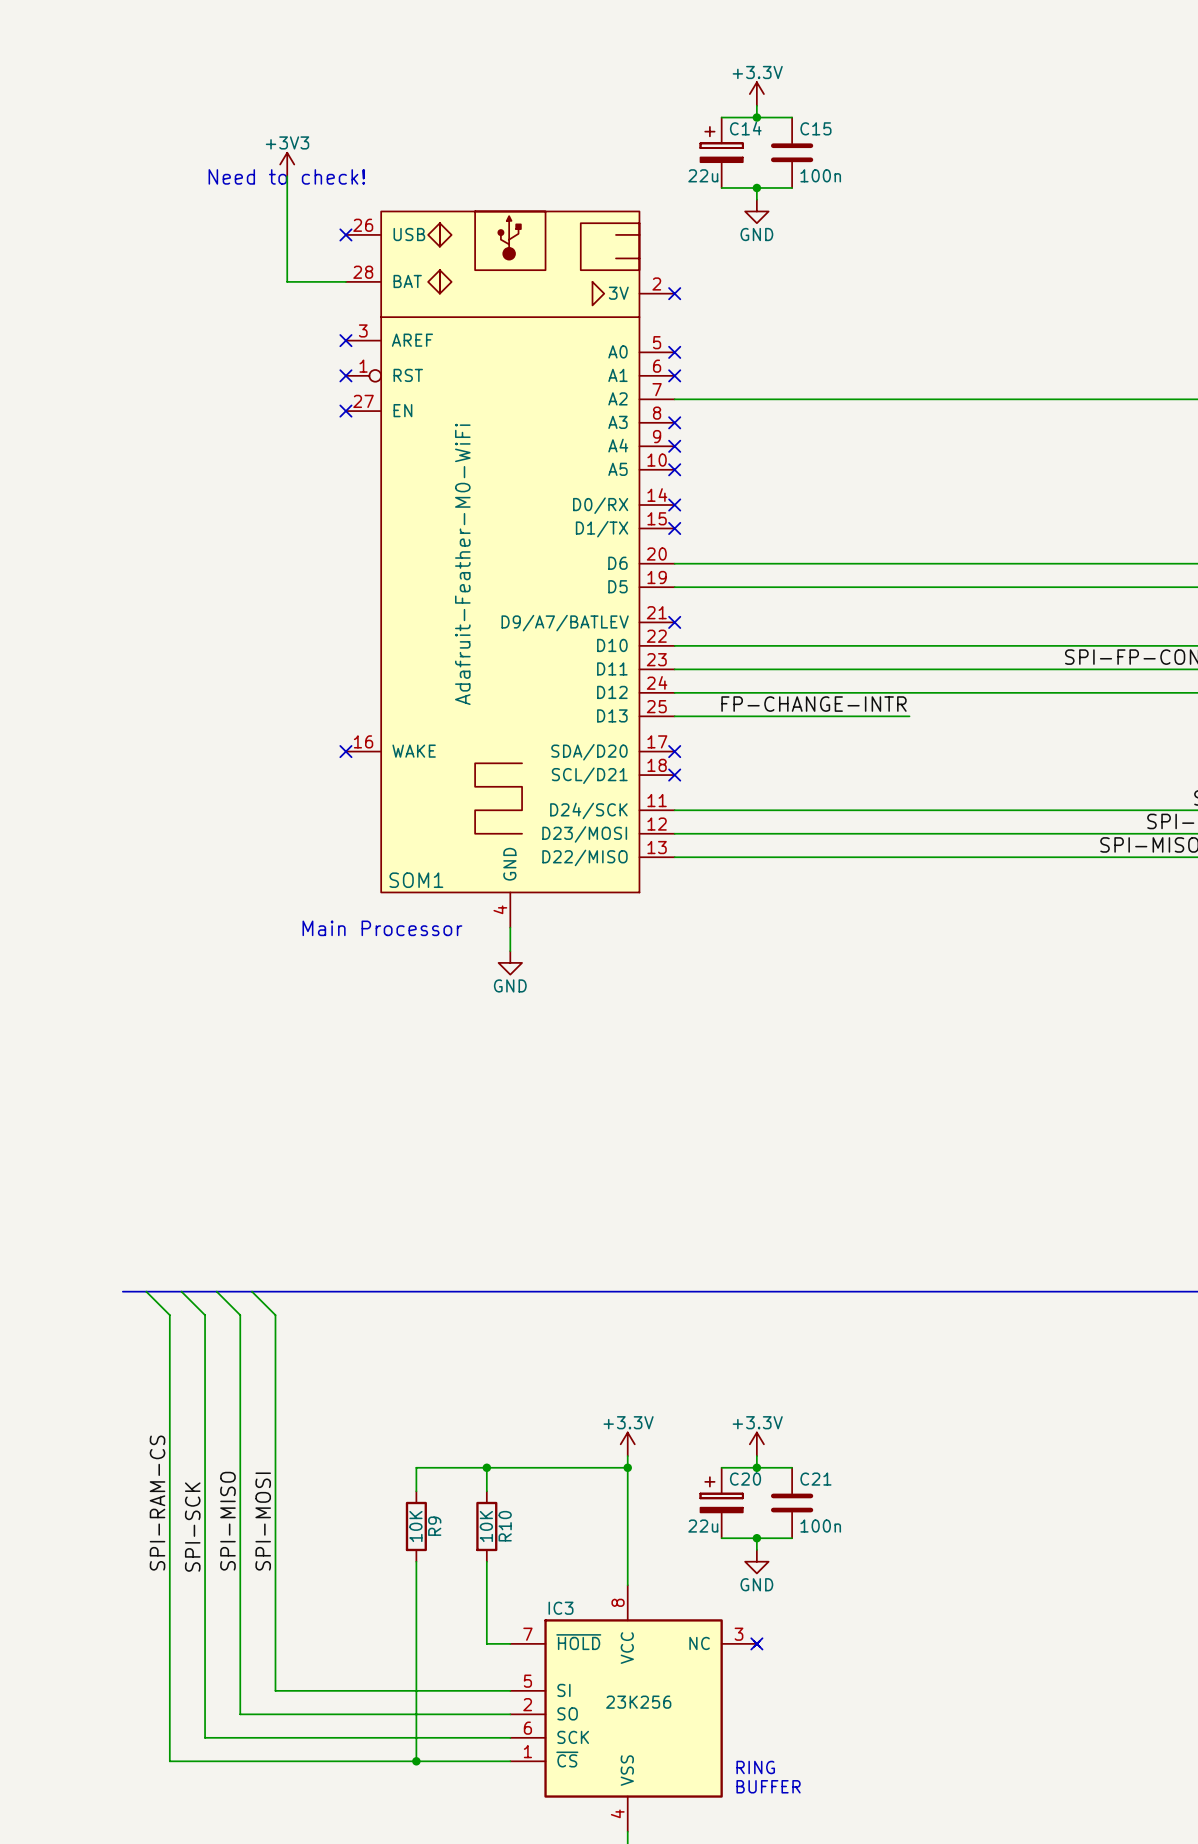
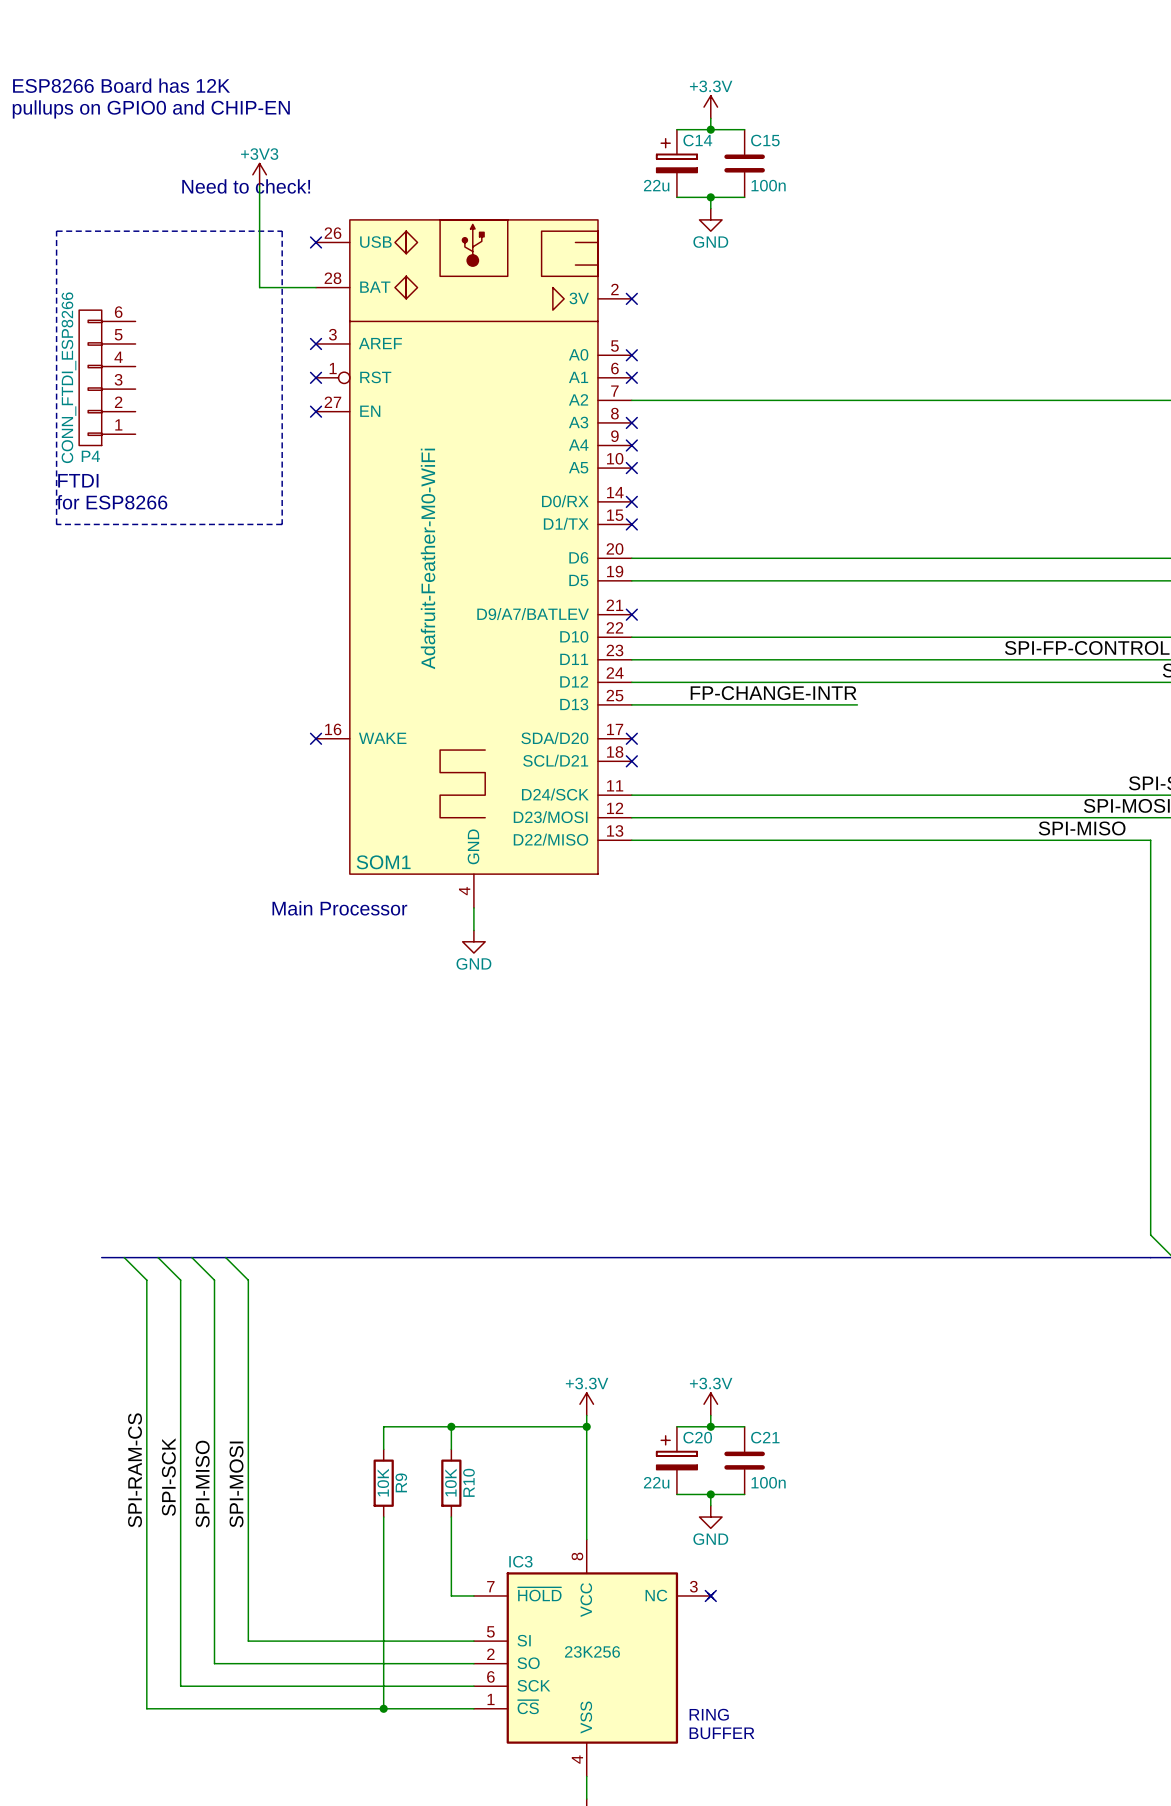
text: none -> ESP8266 Board has 12K (121, 85)
text: none -> pullups on GPIO0 and CHIP-EN (151, 109)
line: none -> (56, 231) (282, 231) (282, 524) (56, 524) (56, 231)
P4: none -> CONN_FTDI_ESP8266 (107, 377)
text: none -> FTDI (78, 480)
text: none -> for ESP8266 (112, 502)

